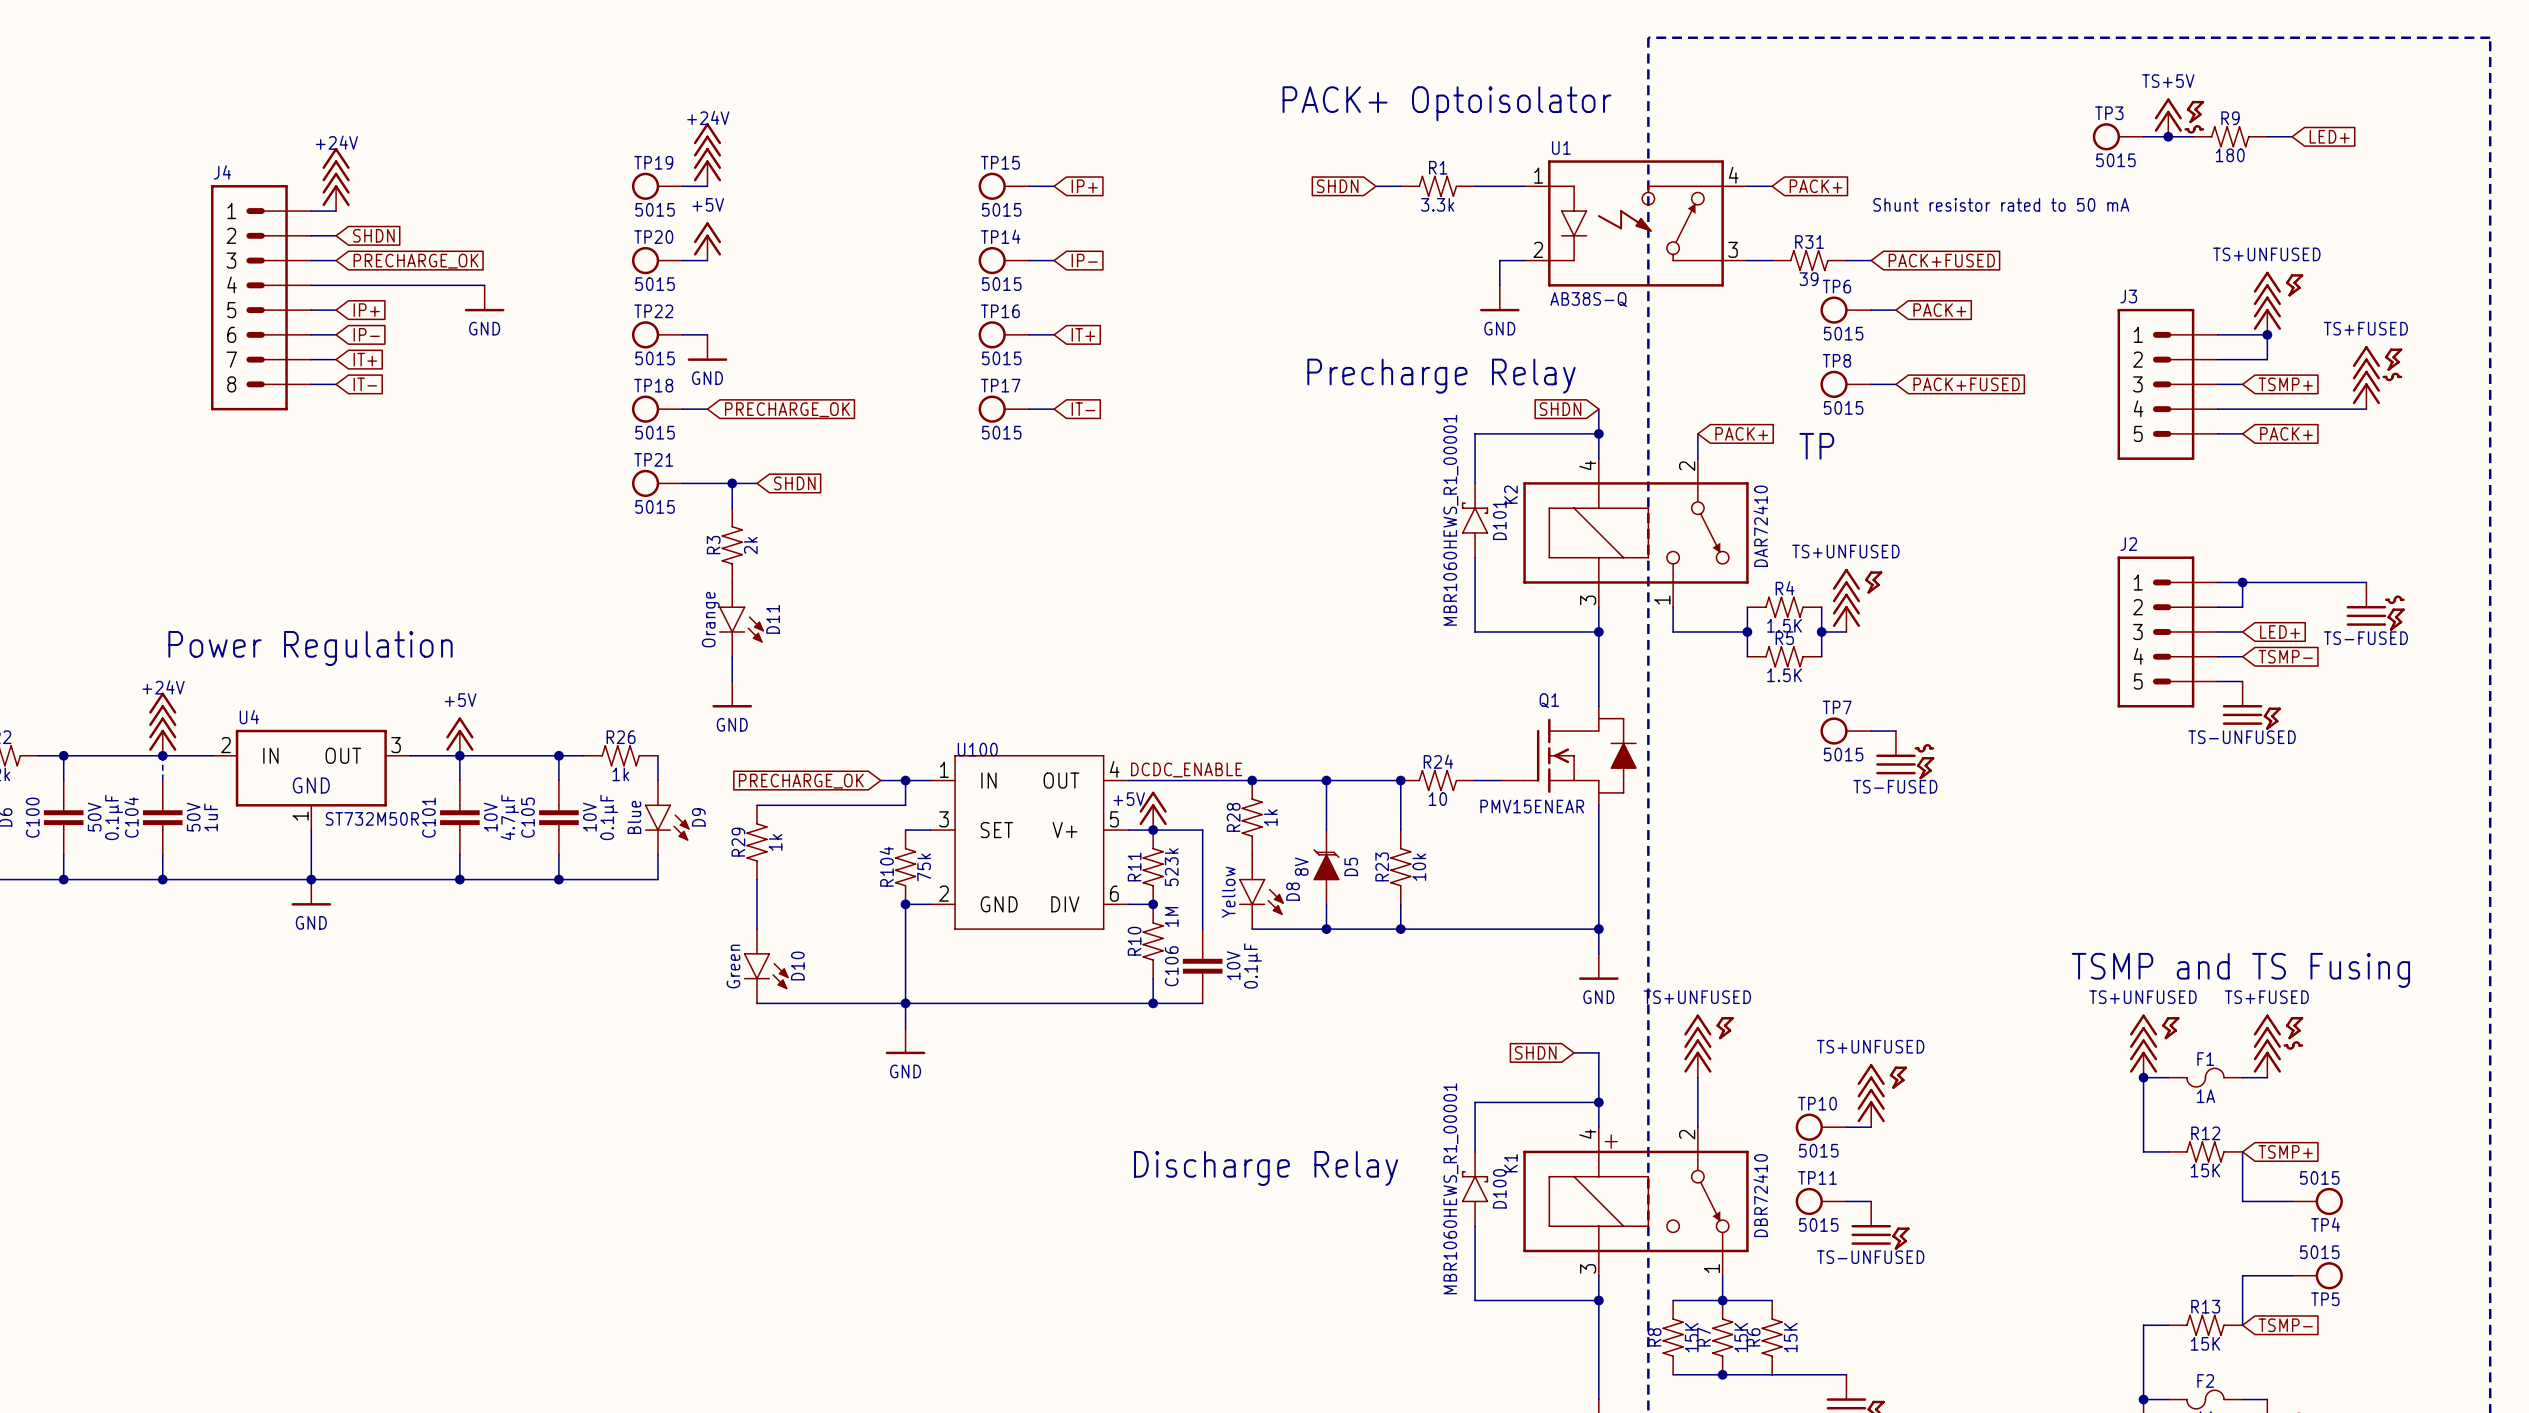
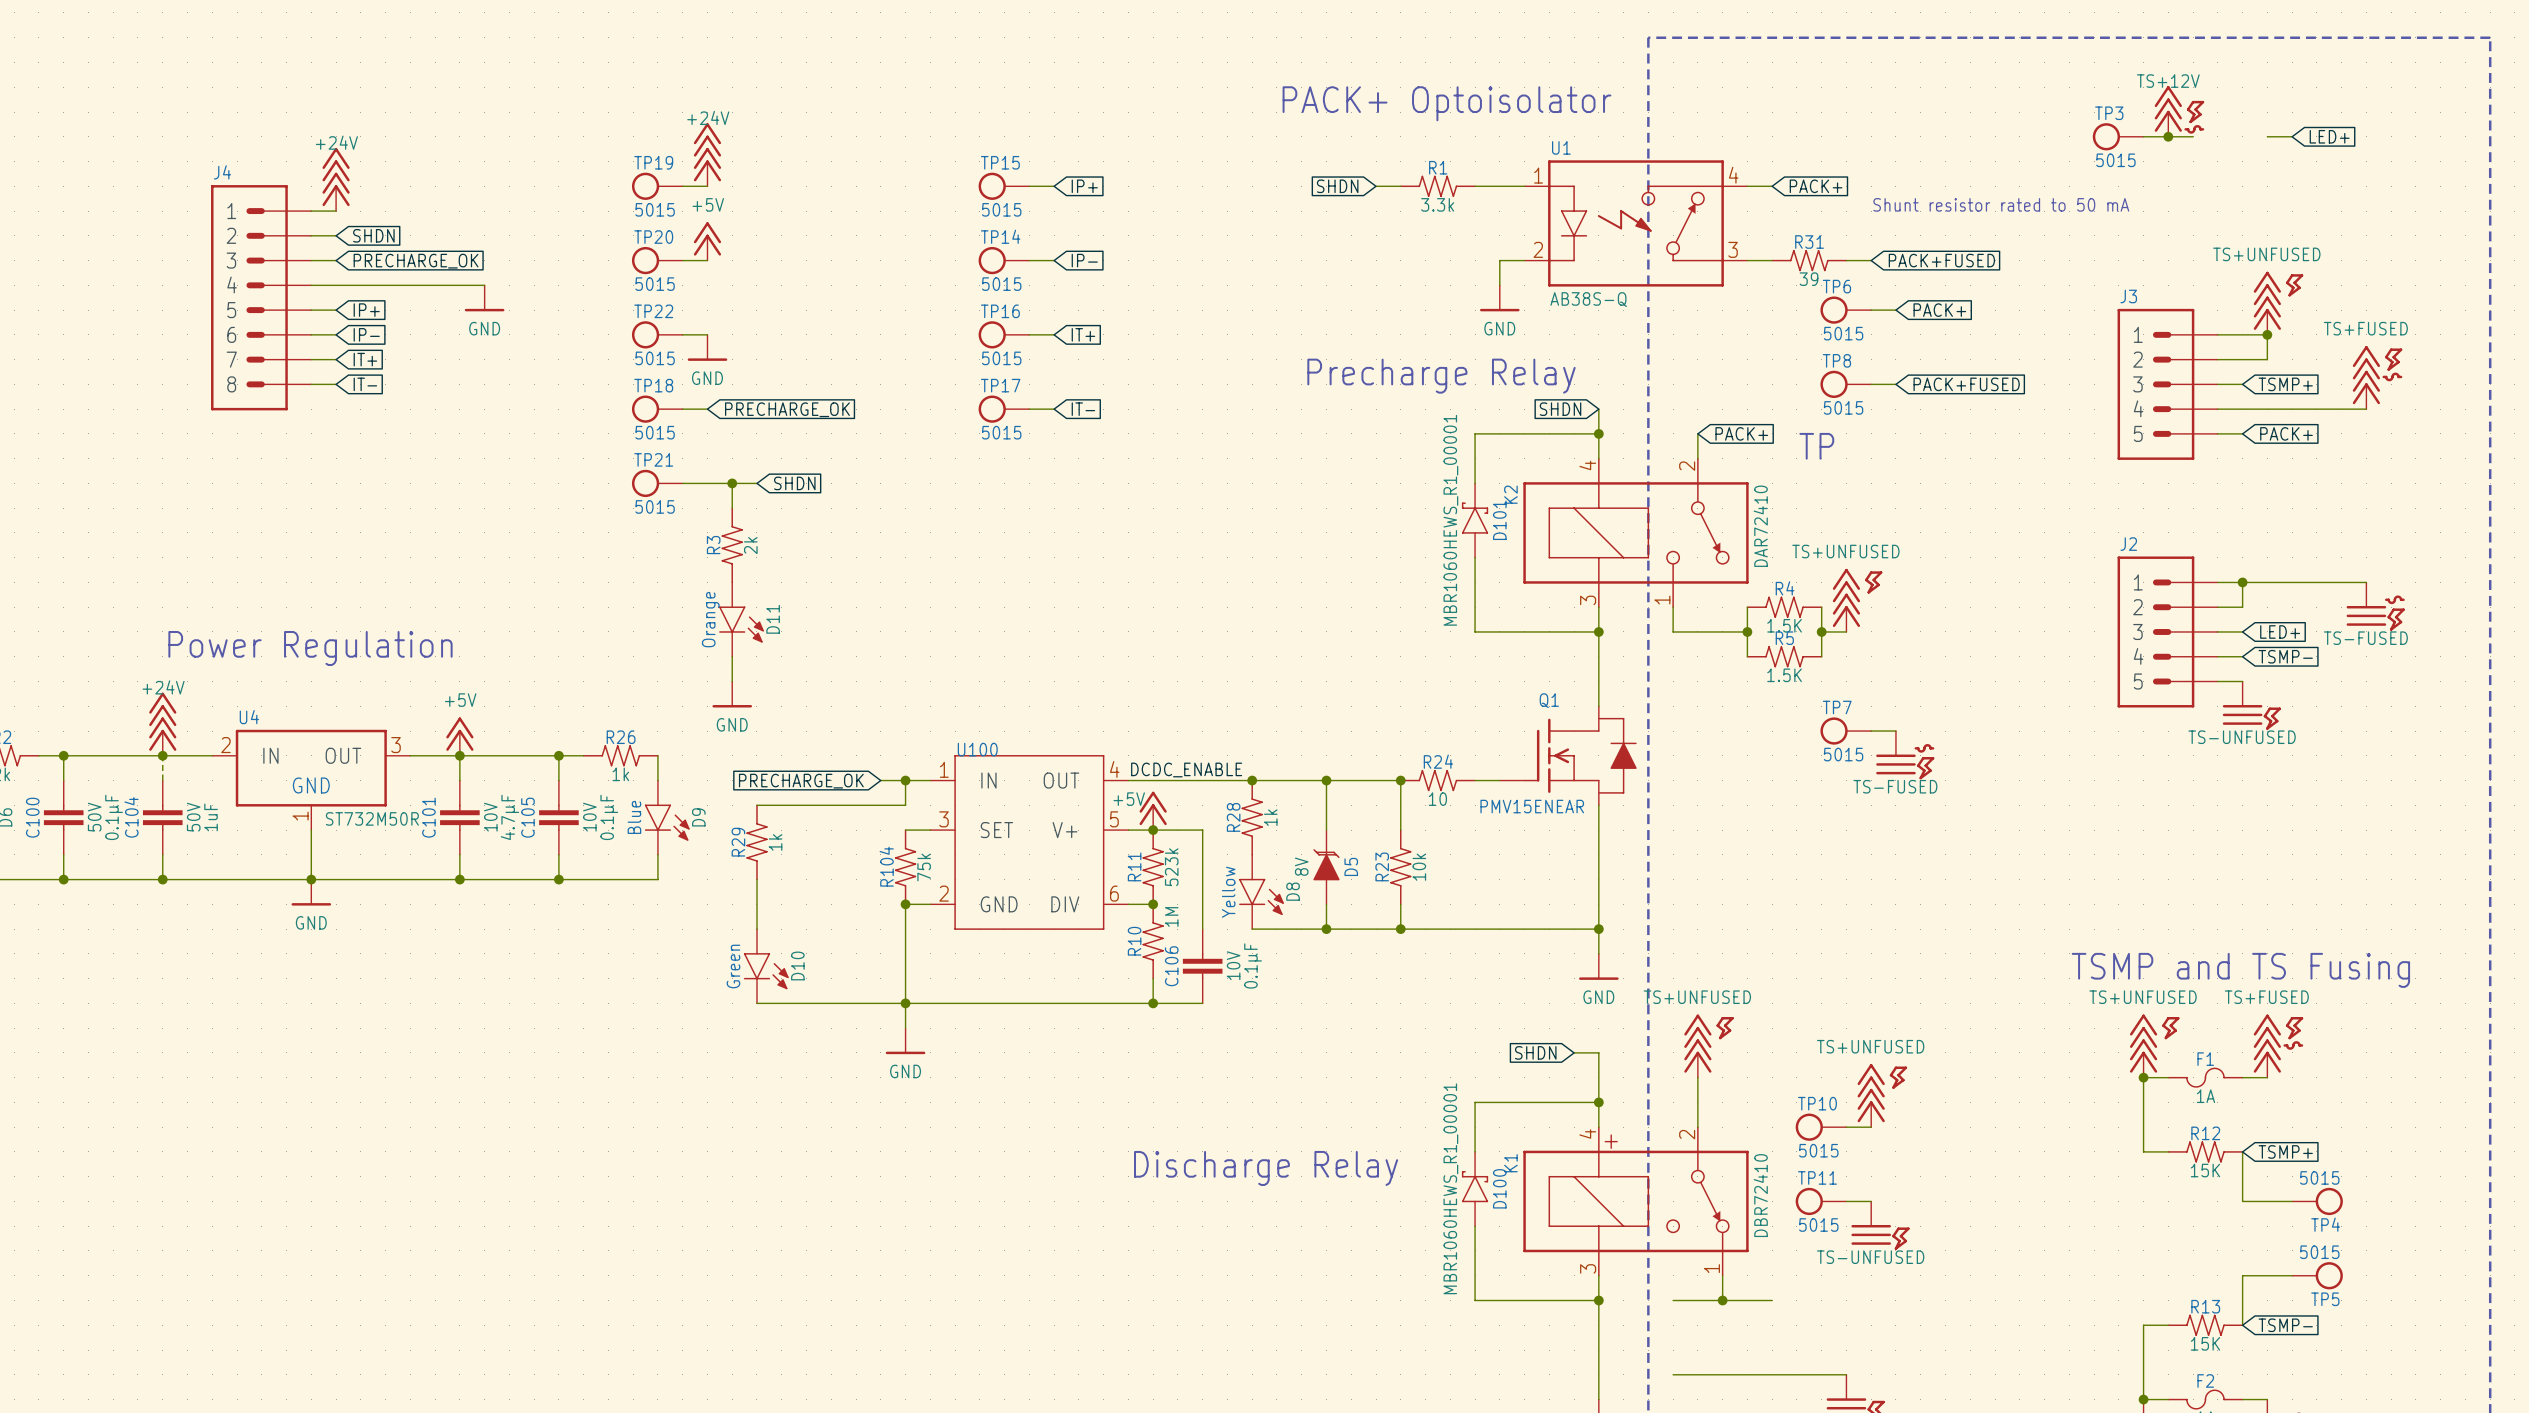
power symbol: TS+5V (2179, 117) -> TS+12V (2179, 111)
R9: (2230, 136) -> none
R8: (1673, 1337) -> none
R7: (1722, 1337) -> none
R6: (1772, 1337) -> none
junction: (1722, 1374) -> none

